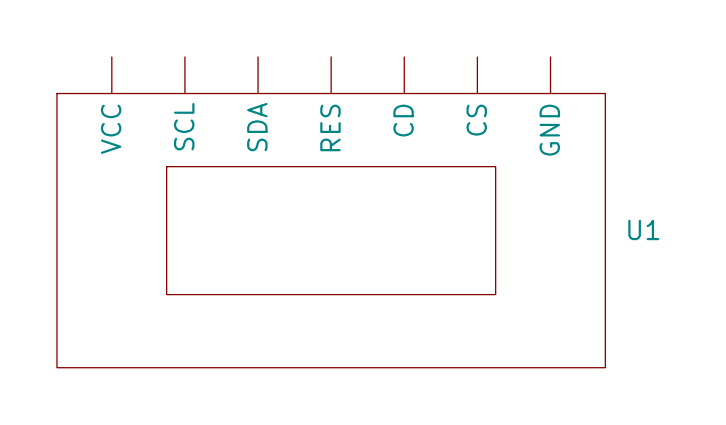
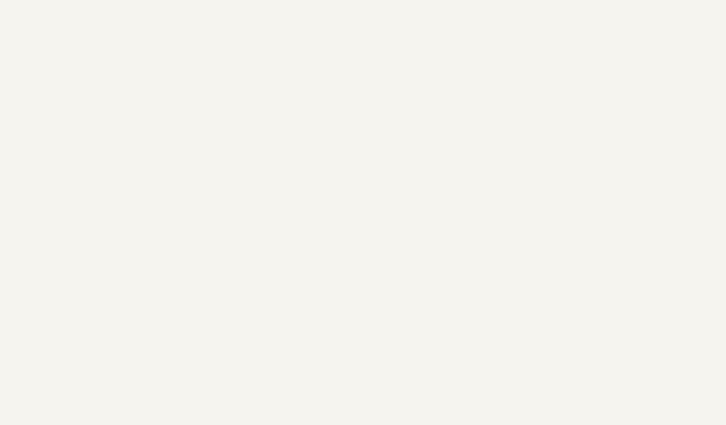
U1: (331, 212) -> none

